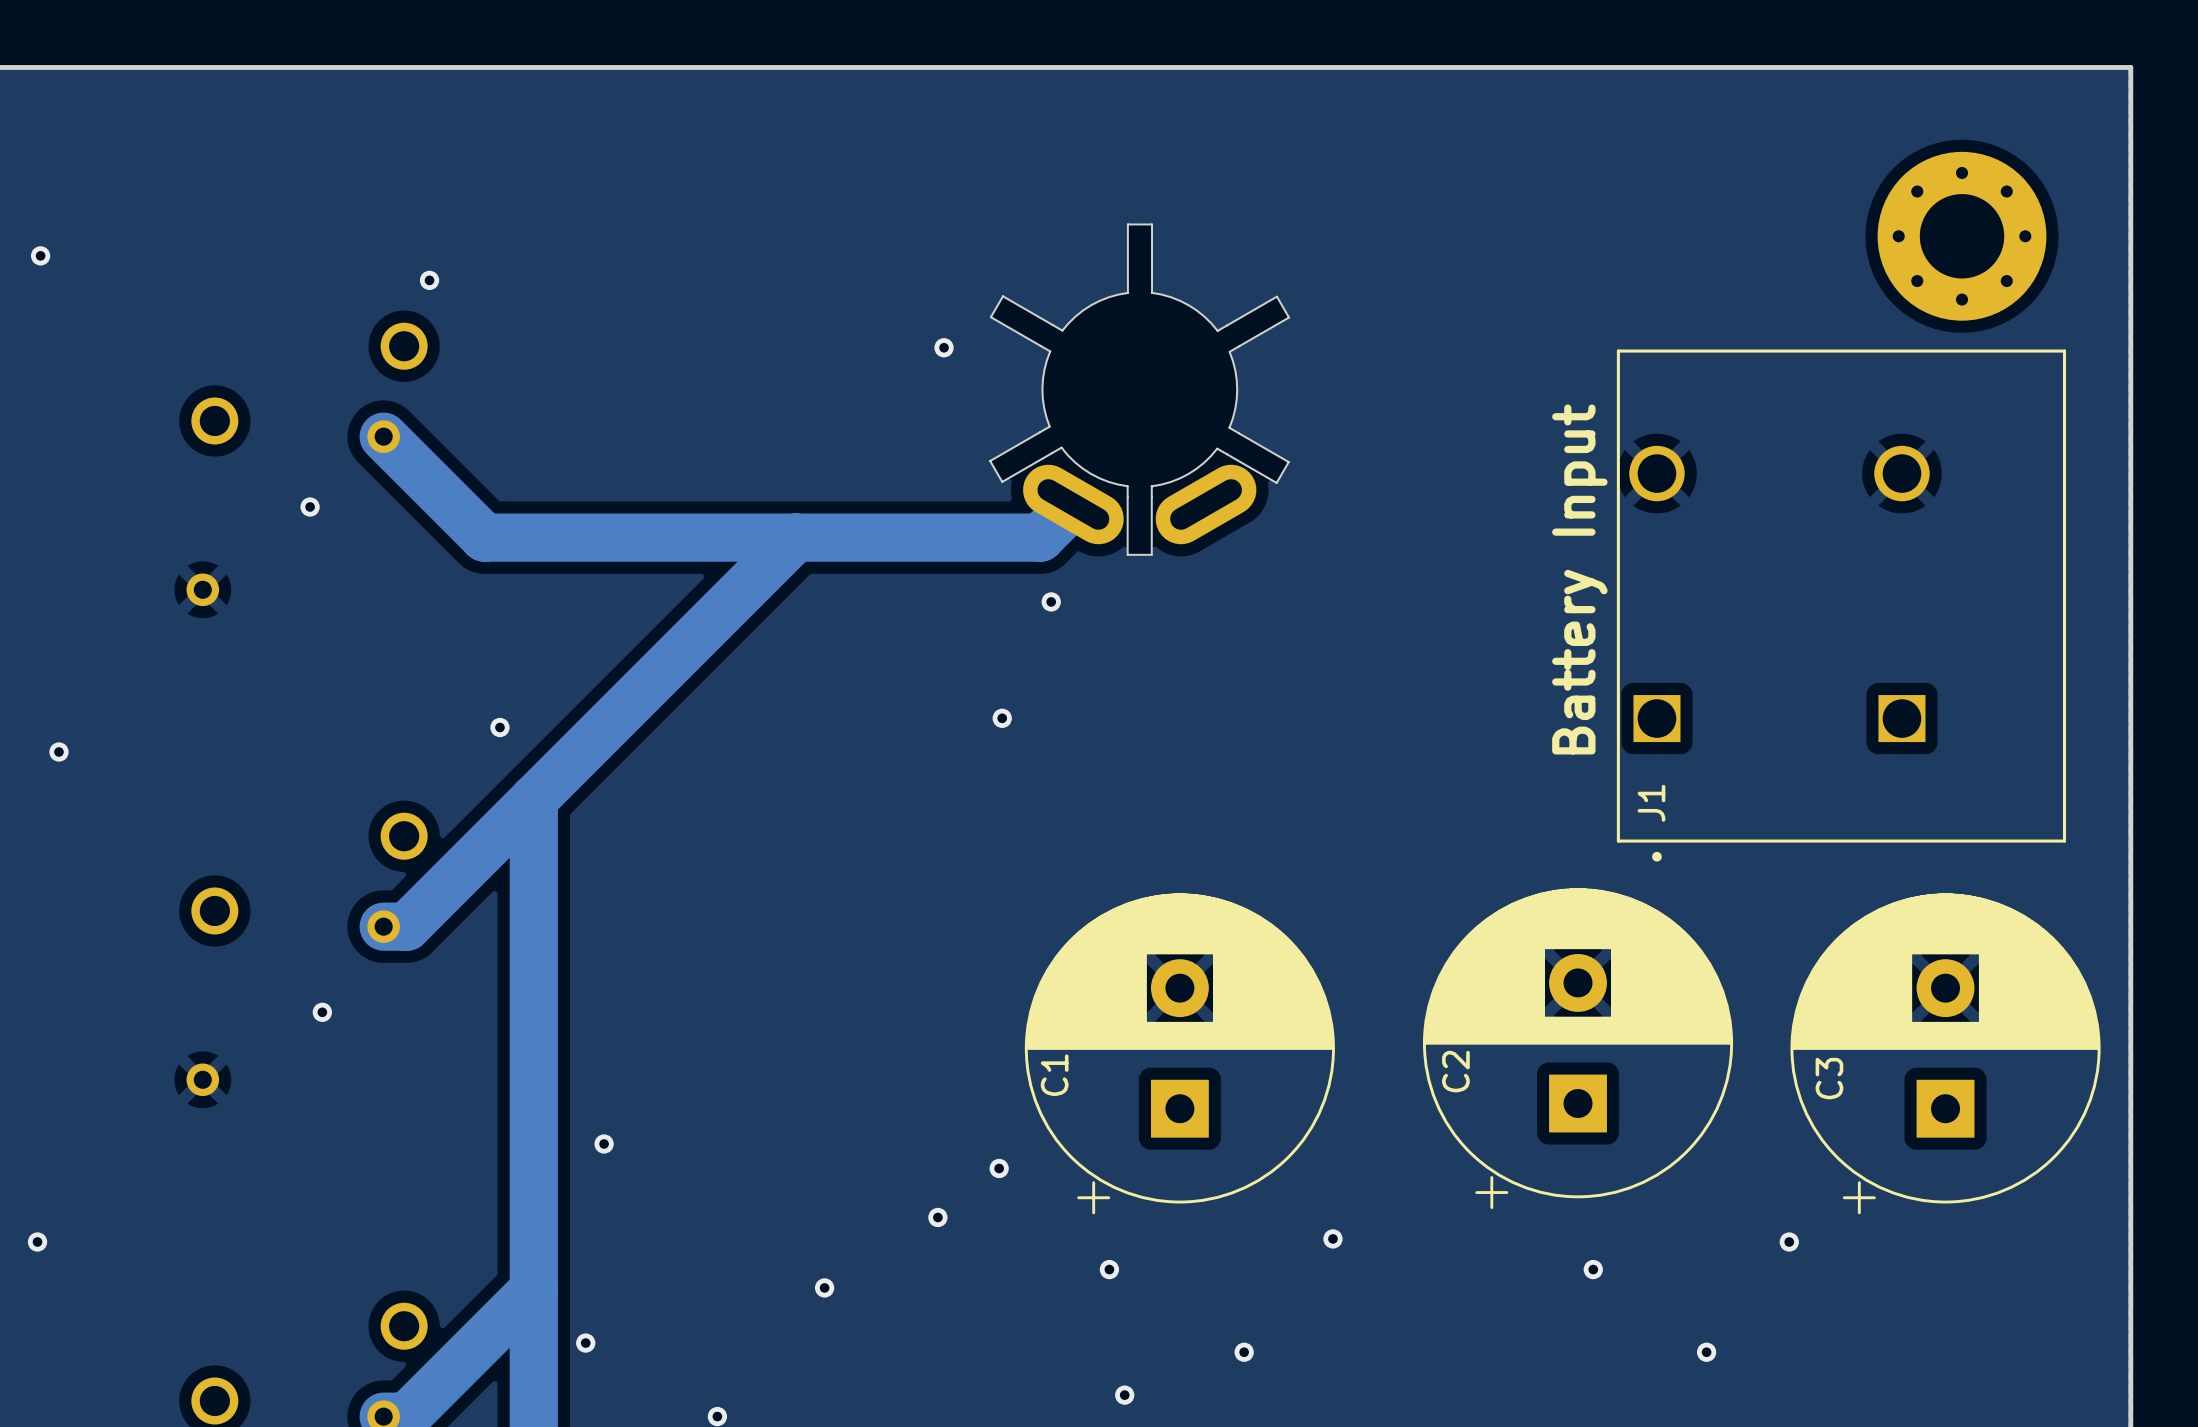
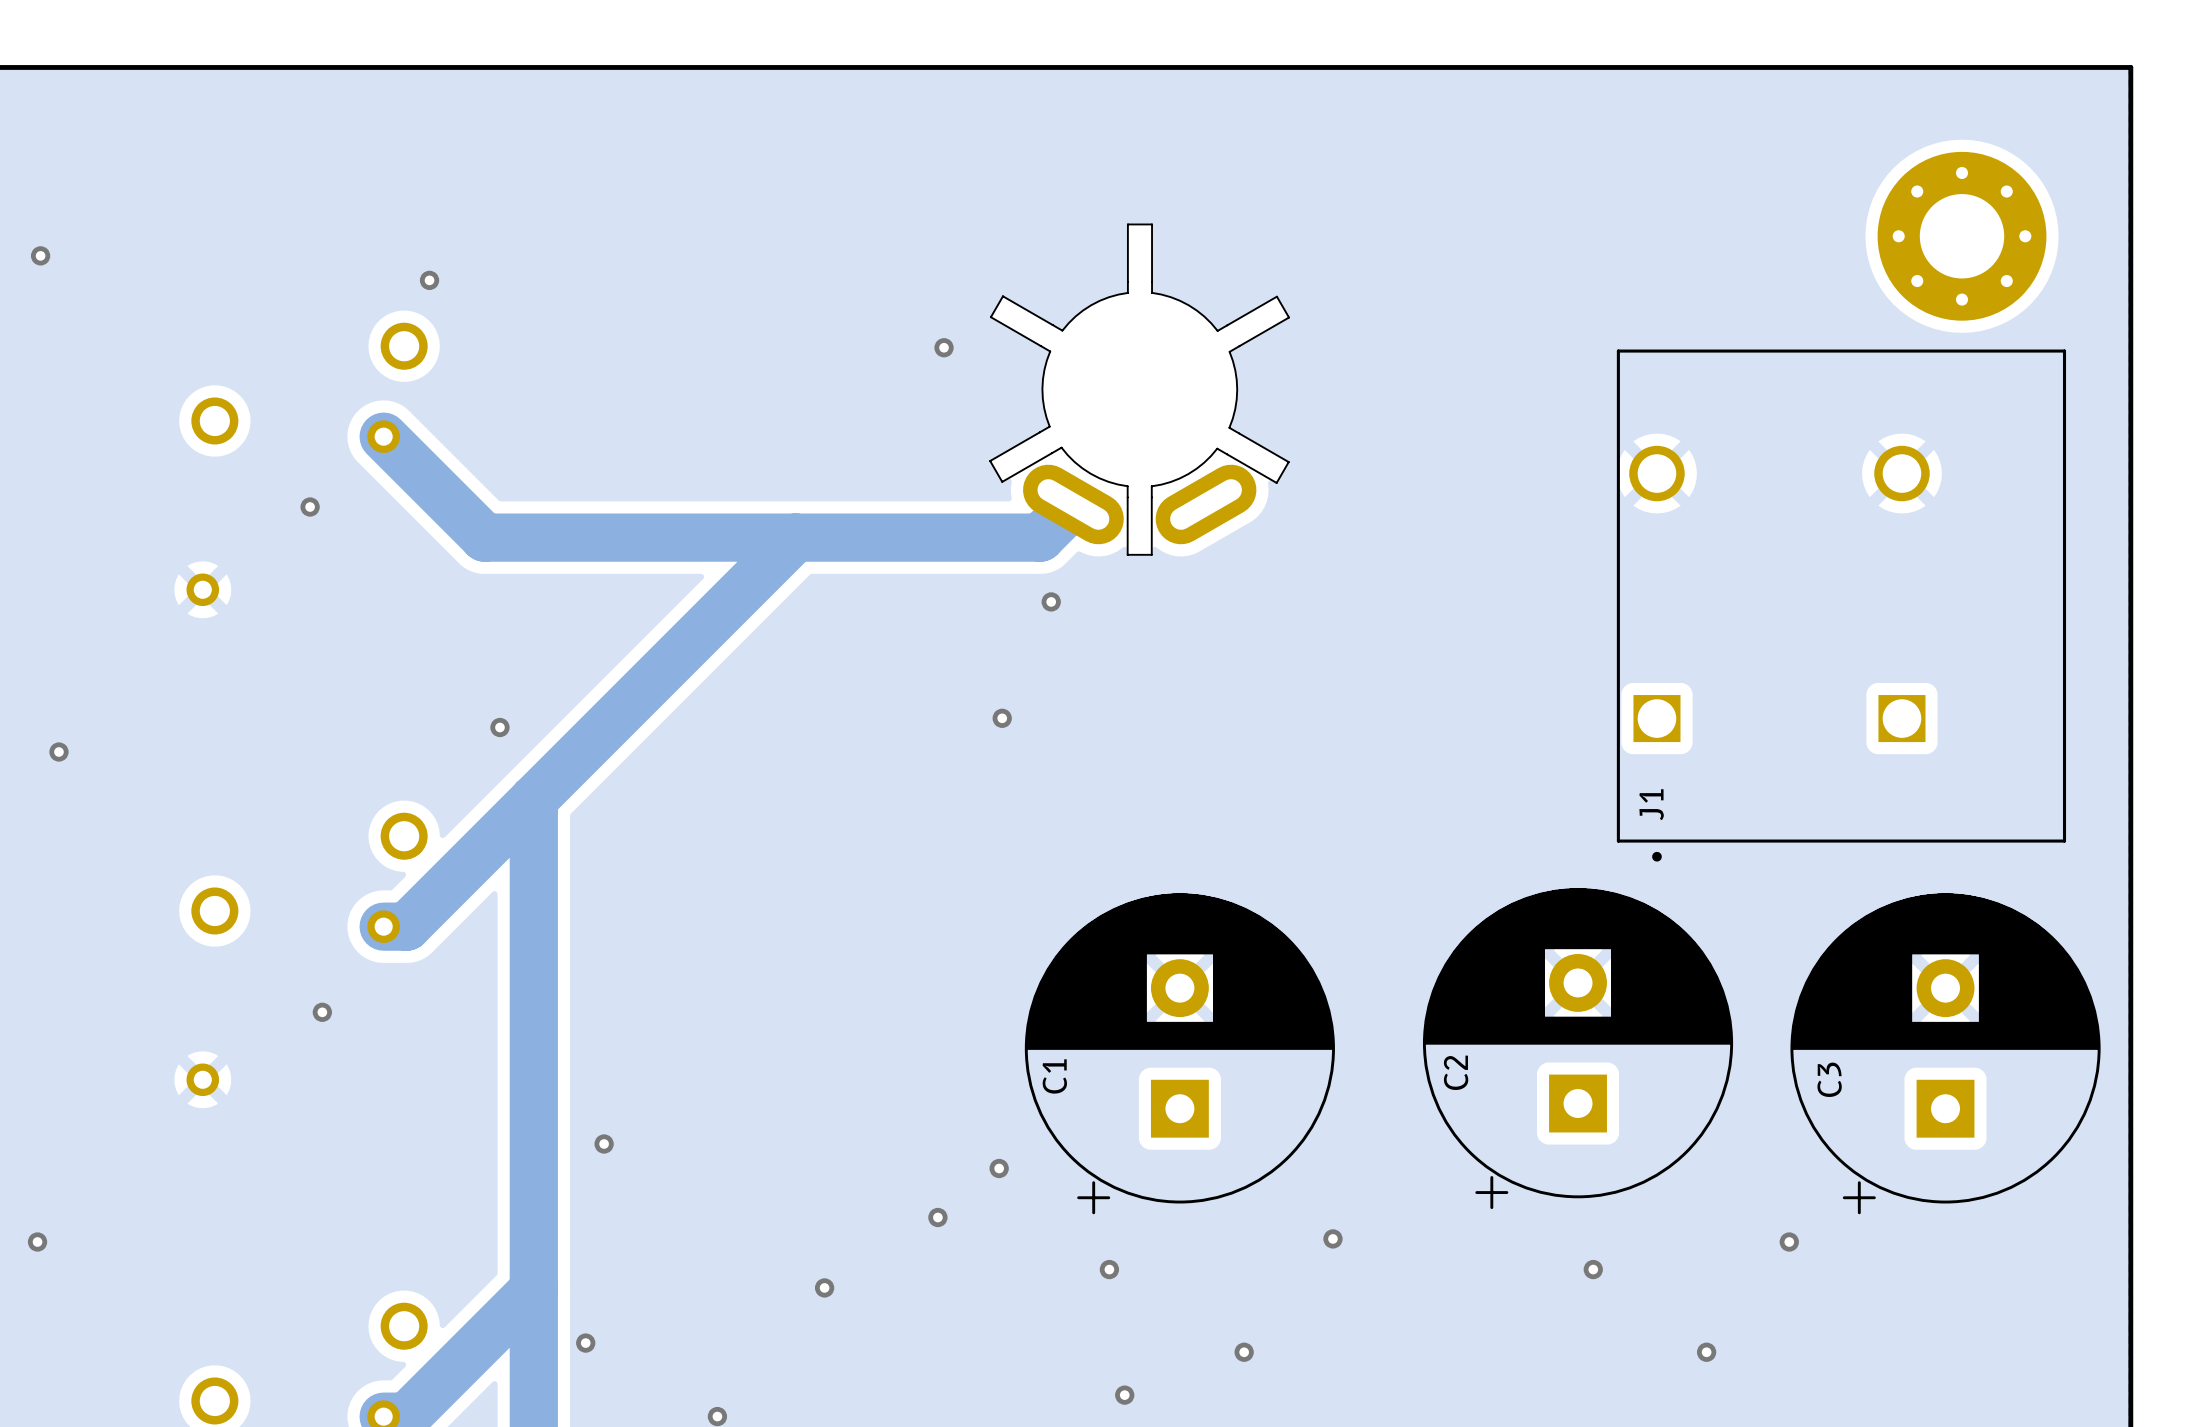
text: Battery Input (1579, 579) -> none

